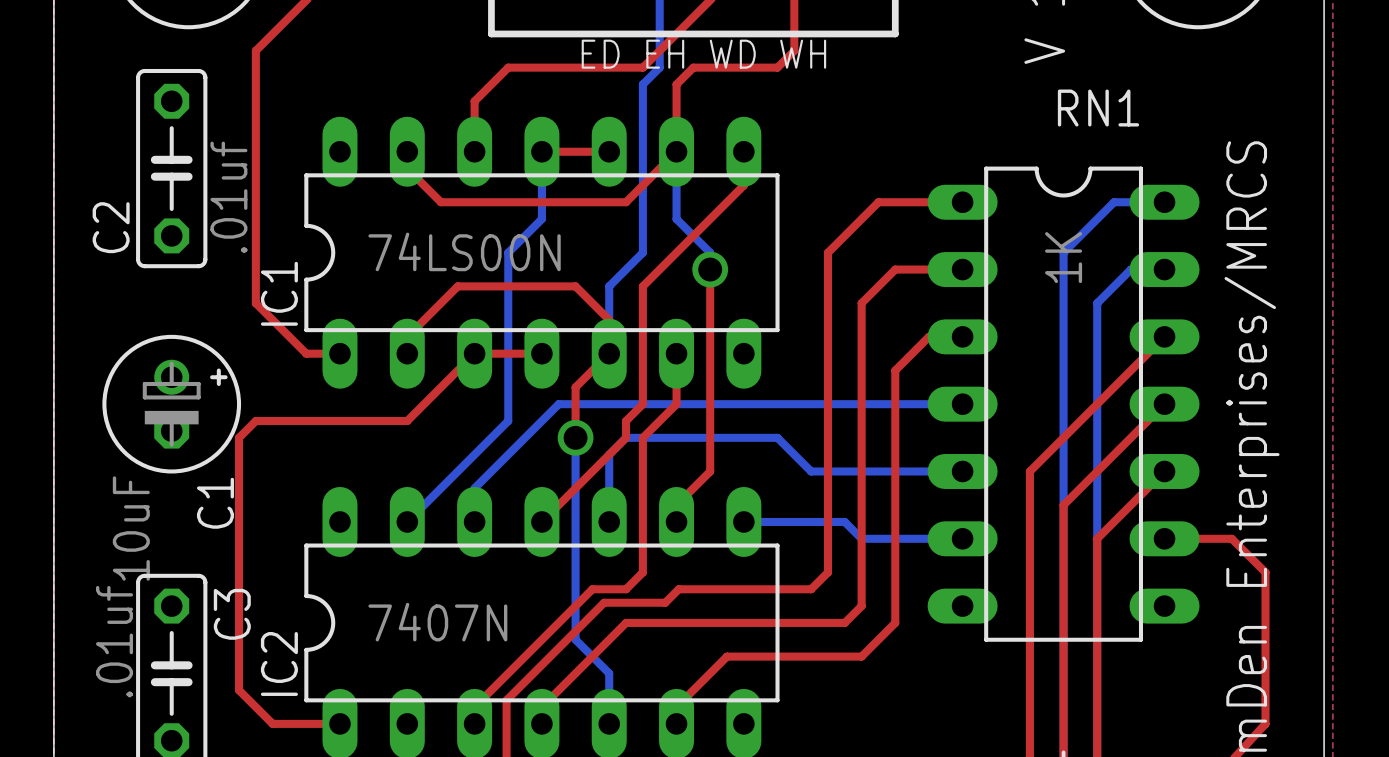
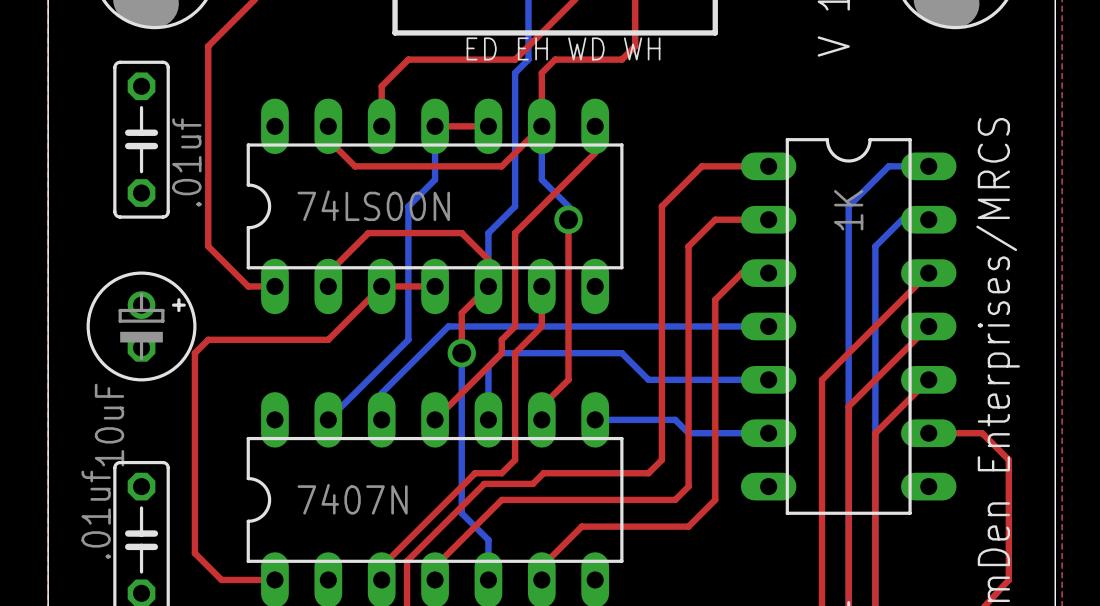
RN1 name: RN1 (1098, 108) -> none
C2 name: C2 (111, 227) -> none
IC1 name: IC1 (279, 293) -> none
C1 name: C1 (215, 503) -> none
C3 name: C3 (232, 614) -> none
IC2 name: IC2 (279, 663) -> none

